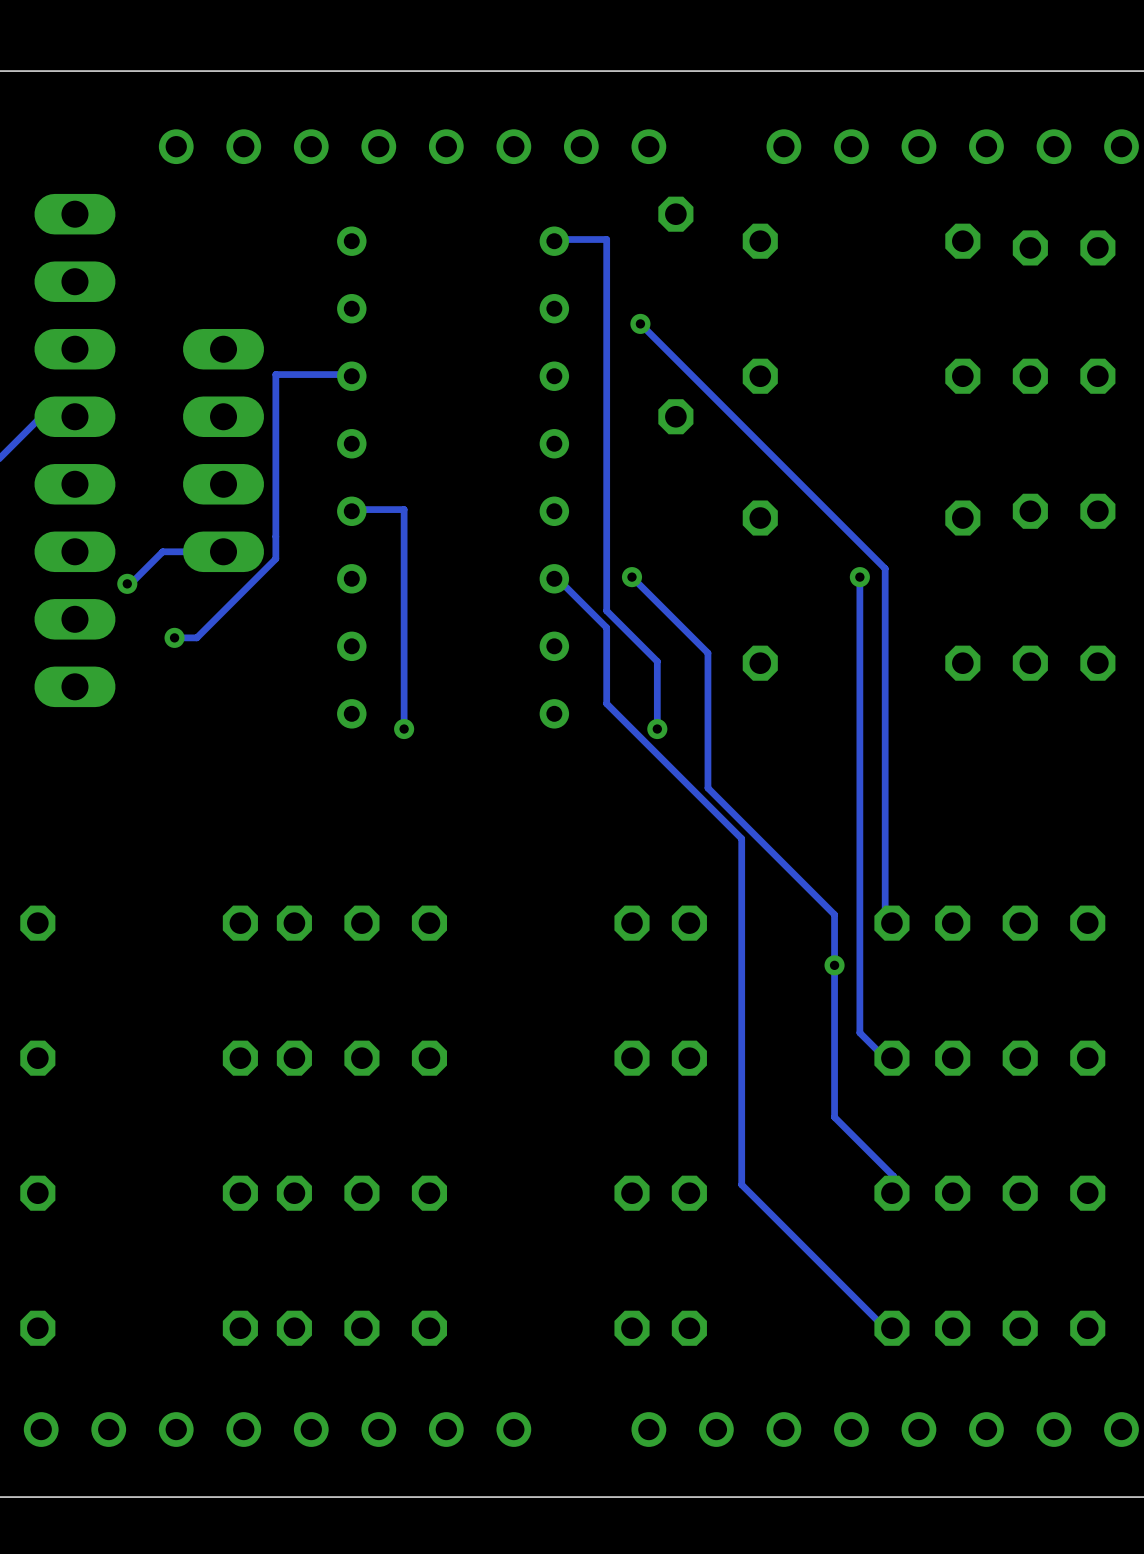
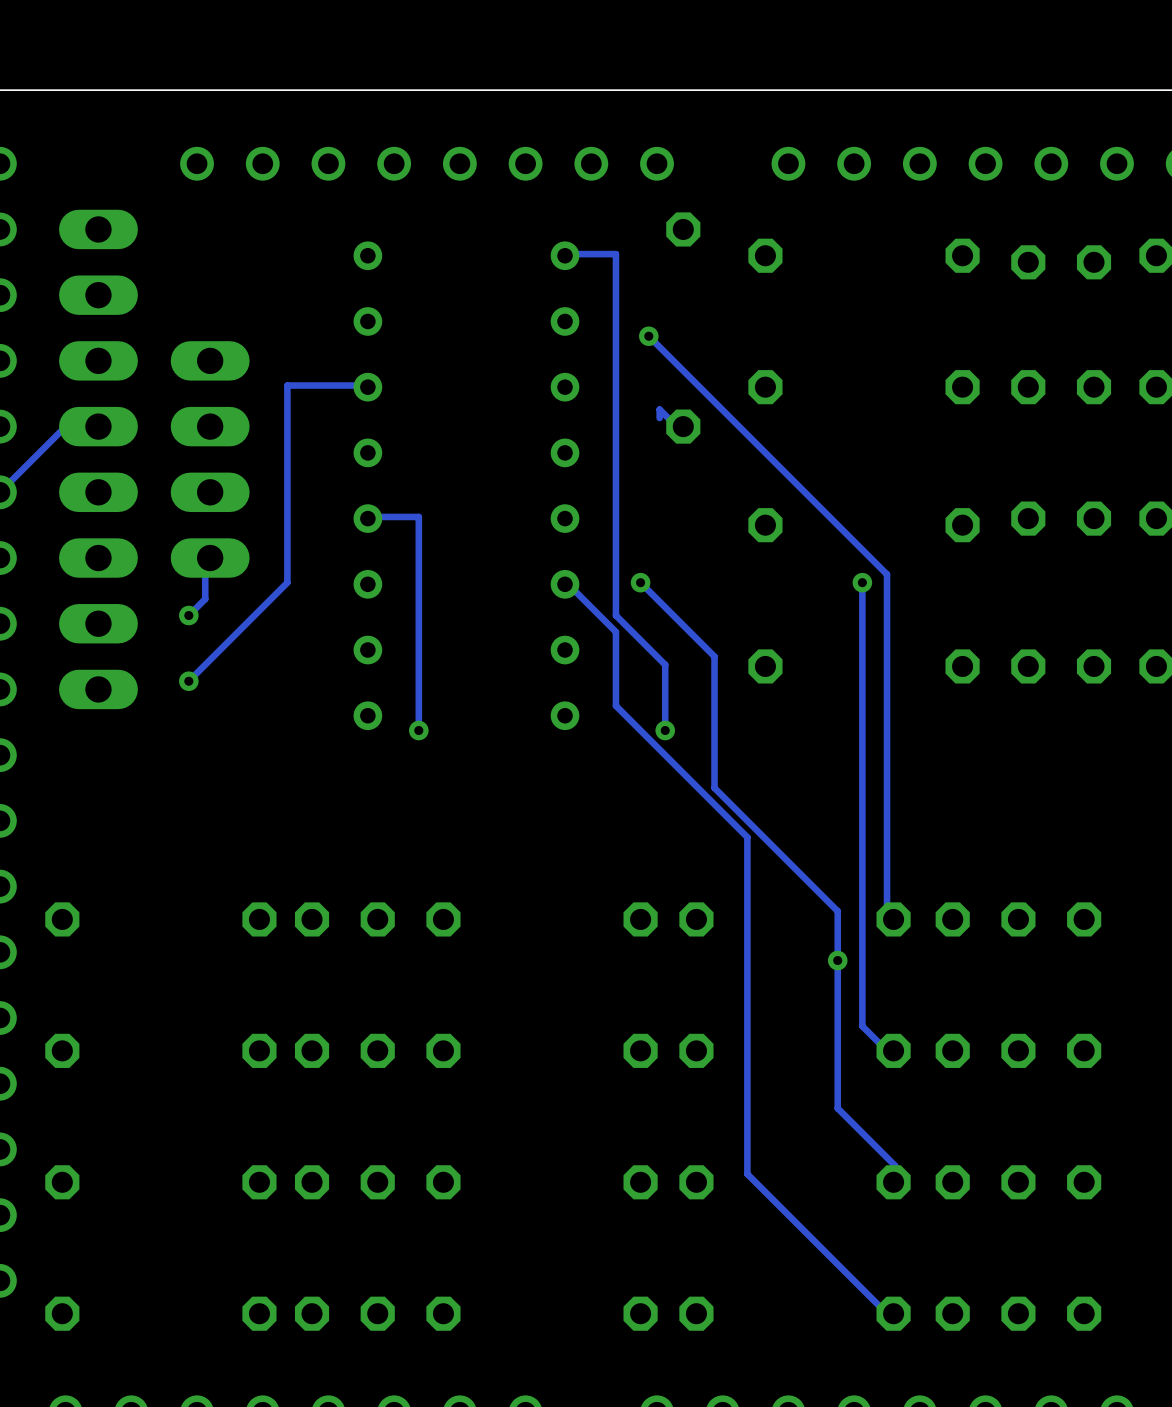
track: (275, 374) (275, 558) (196, 637) (174, 637) -> (293, 385) (287, 385) (287, 582) (188, 681)
track: none -> (659, 418) (659, 409) (676, 426)
part position: (223, 450) -> (210, 459)
track: (184, 551) (162, 551) (130, 583) (127, 583) -> (205, 558) (205, 599) (188, 615)
via: (127, 583) -> none
via: none -> (188, 615)
via: (174, 637) -> none
via: none -> (188, 681)

